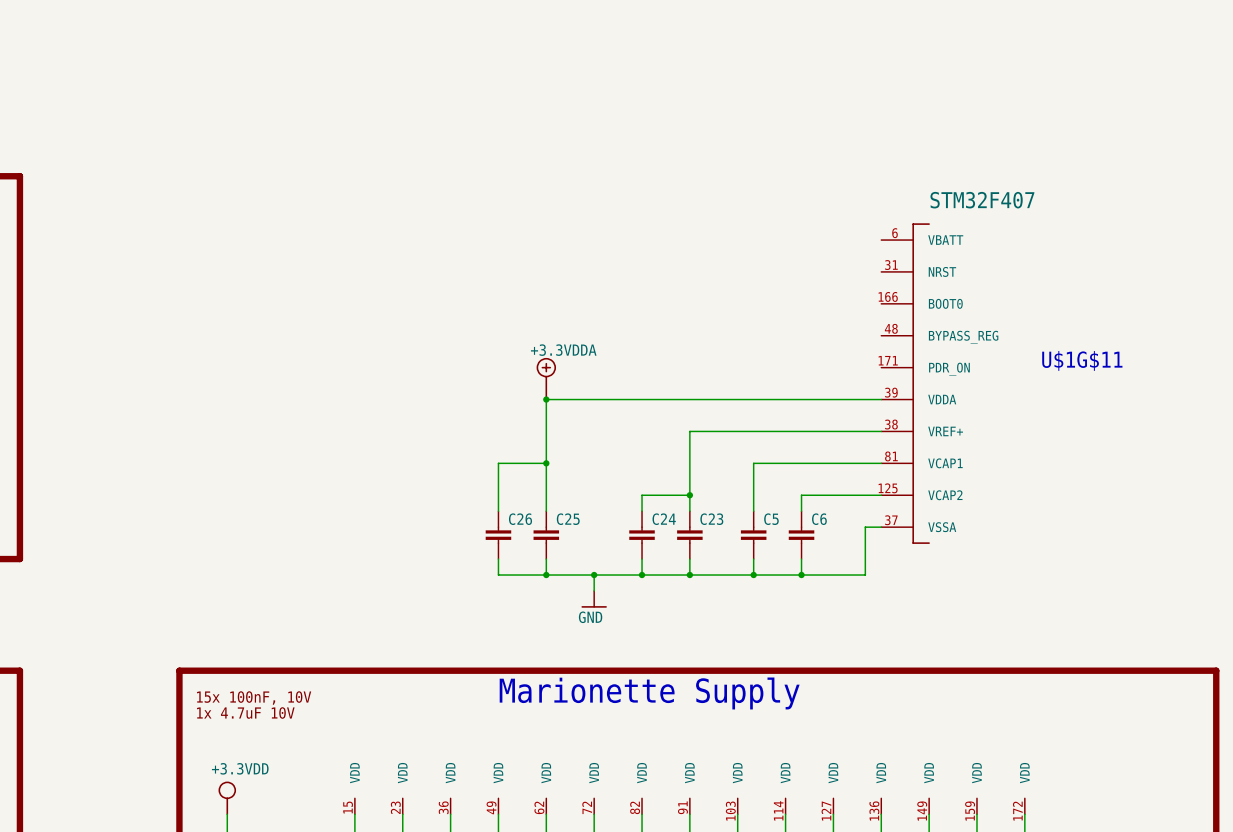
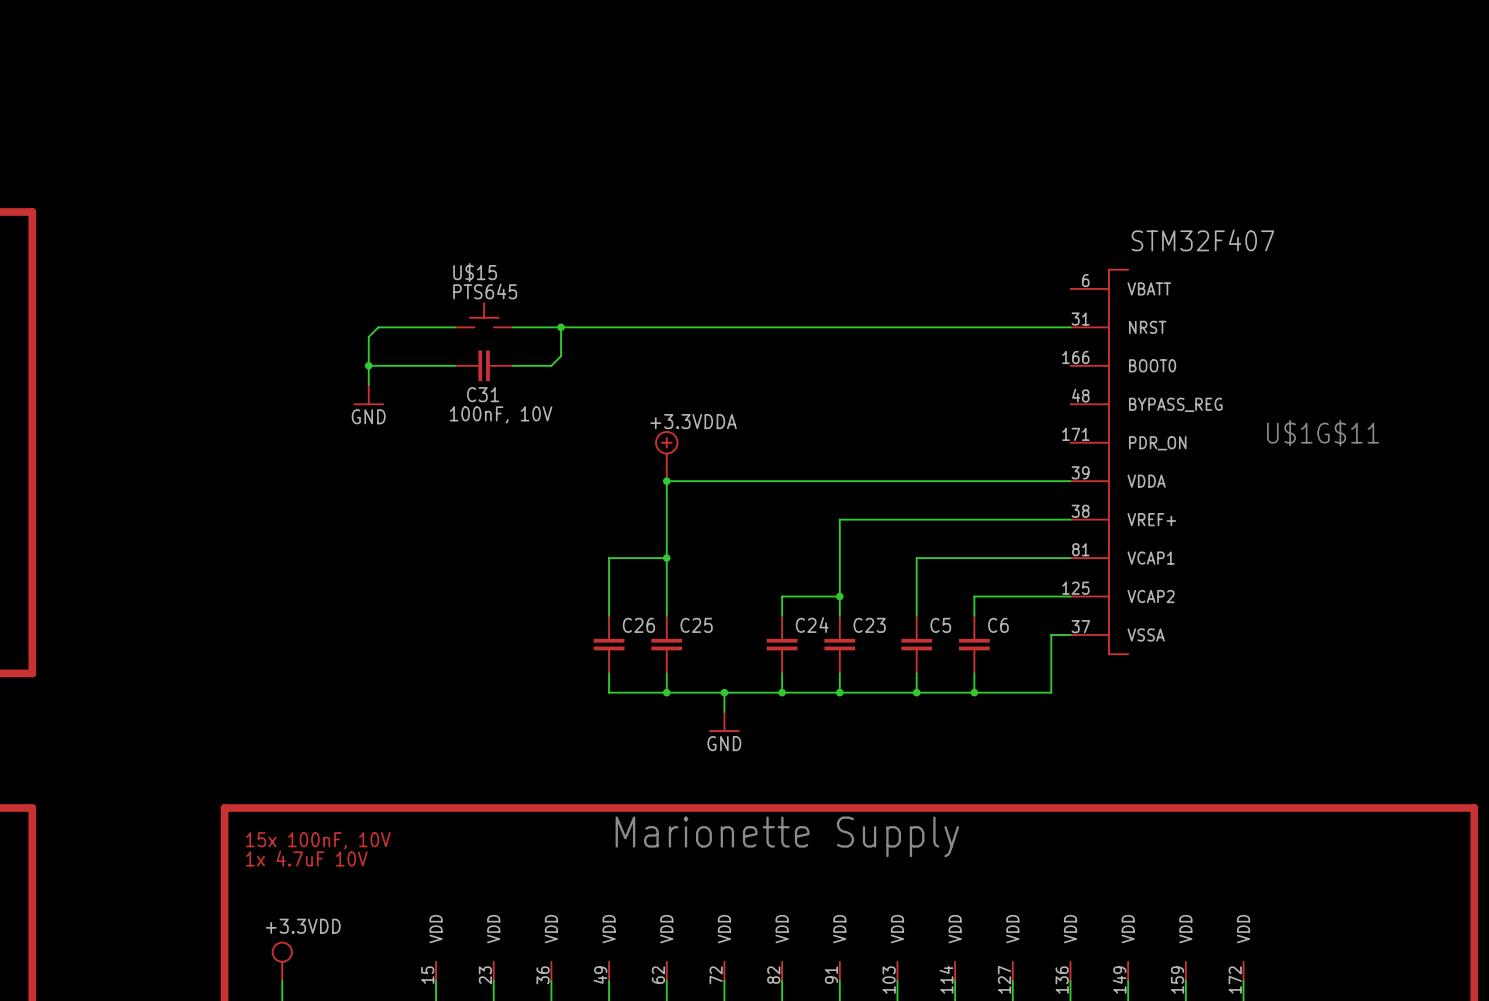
U$15: none -> PTS645 (484, 314)
wire: none -> (455, 327) (378, 327) (368, 336) (368, 385)
wire: none -> (512, 327) (1070, 327)
wire: none -> (561, 327) (561, 356) (551, 365) (512, 365)
junction: none -> (561, 327)
wire: none -> (368, 365) (455, 365)
junction: none -> (368, 365)
C31: none -> 100nF, 10V (484, 365)
power symbol: none -> GND (368, 395)

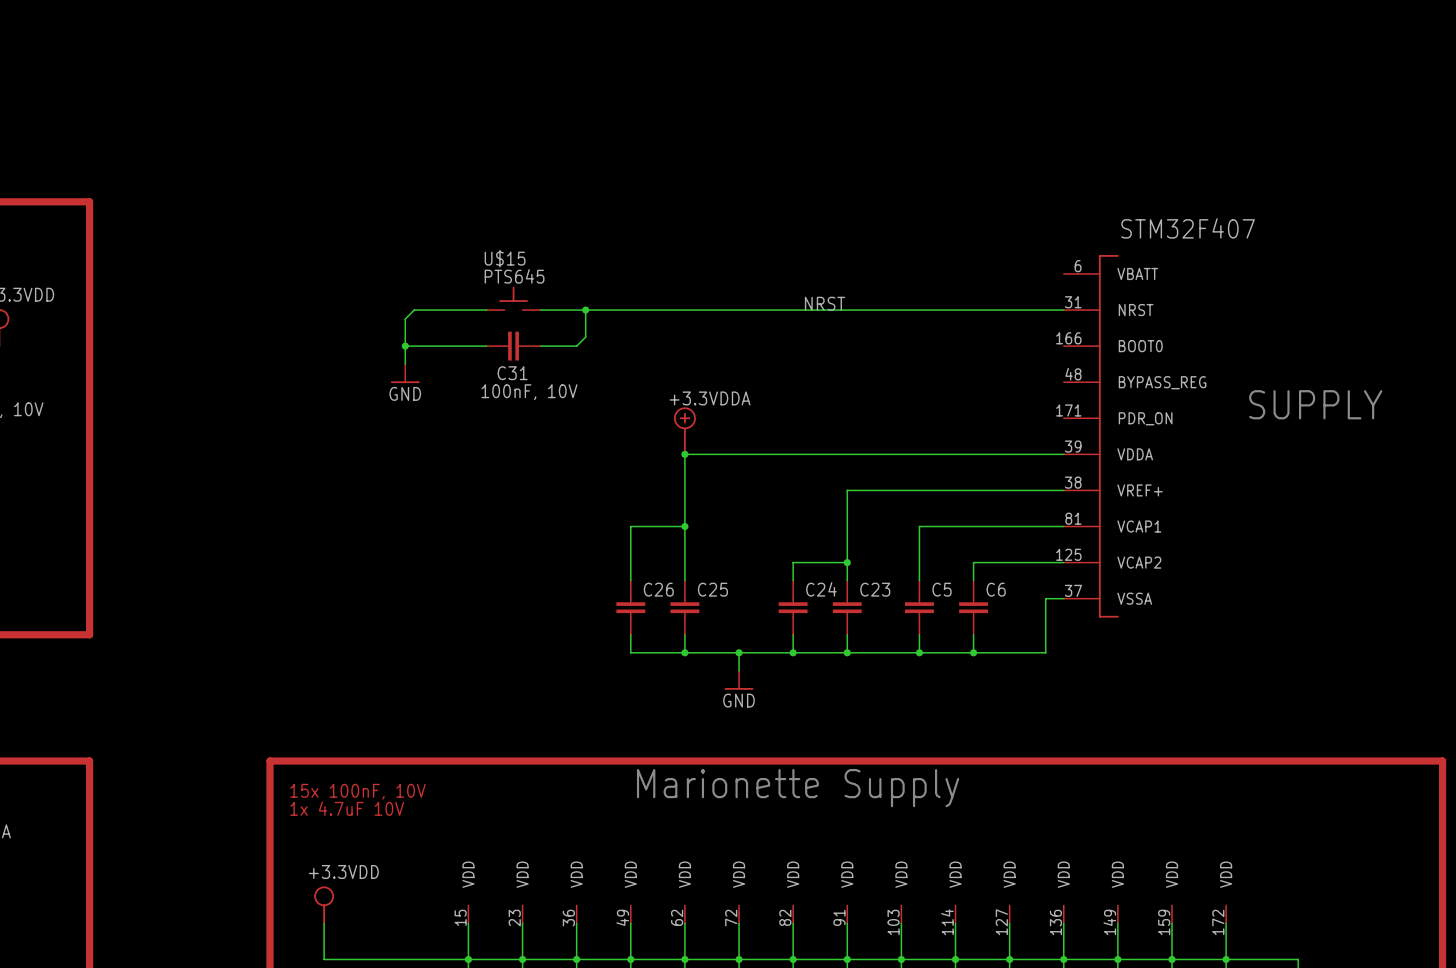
label: none -> NRST (825, 303)
U$1G$11 text: none -> SUPPLY (1315, 404)
U$1G$11 name: U$1G$11 (1323, 433) -> none

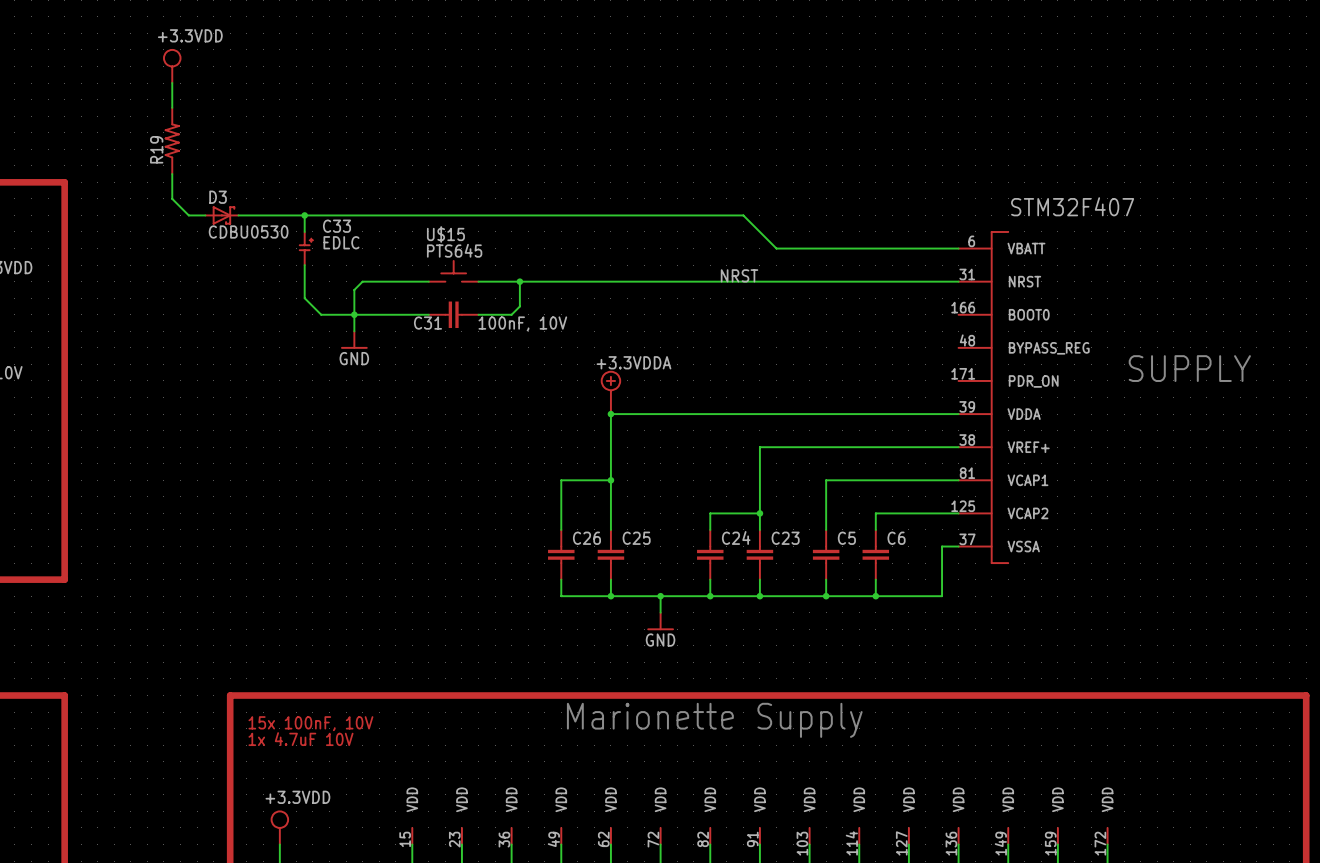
power symbol: none -> +3.3VDD (172, 66)
wire: none -> (172, 83) (172, 107)
R19: none -> (172, 140)
wire: none -> (172, 174) (172, 198) (188, 215) (205, 215)
D3: none -> CDBU0530 (221, 215)
wire: none -> (238, 215) (743, 215) (776, 248) (958, 248)
wire: none -> (304, 215) (304, 231)
junction: none -> (304, 215)
C33: none -> EDLC (306, 248)
wire: none -> (304, 265) (304, 298) (321, 314) (354, 314)
C31 name position: C31 (512, 373) -> C31 (427, 323)
C31 value position: 100nF, 10V (529, 392) -> 100nF, 10V (522, 323)

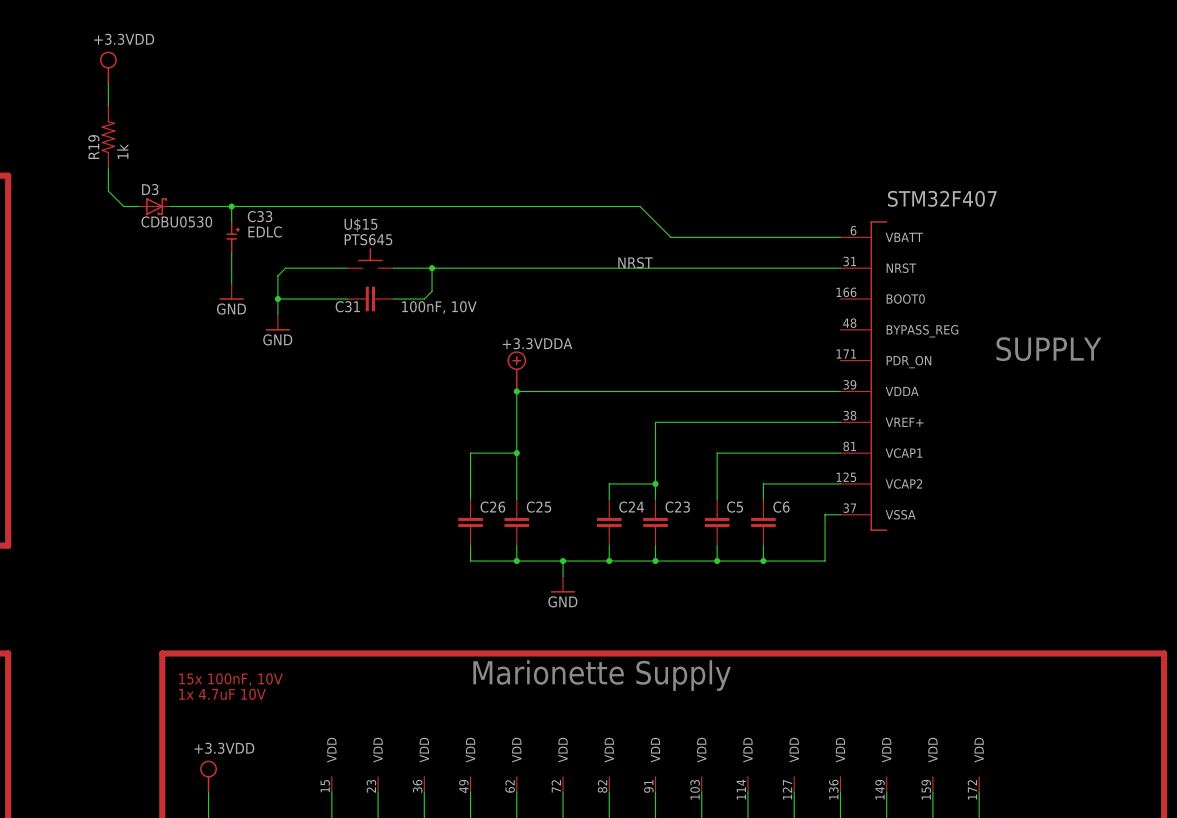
R19 value: none -> 1k (122, 151)
wire: (304, 298) (321, 314) (354, 314) -> none
power symbol: none -> GND (231, 291)

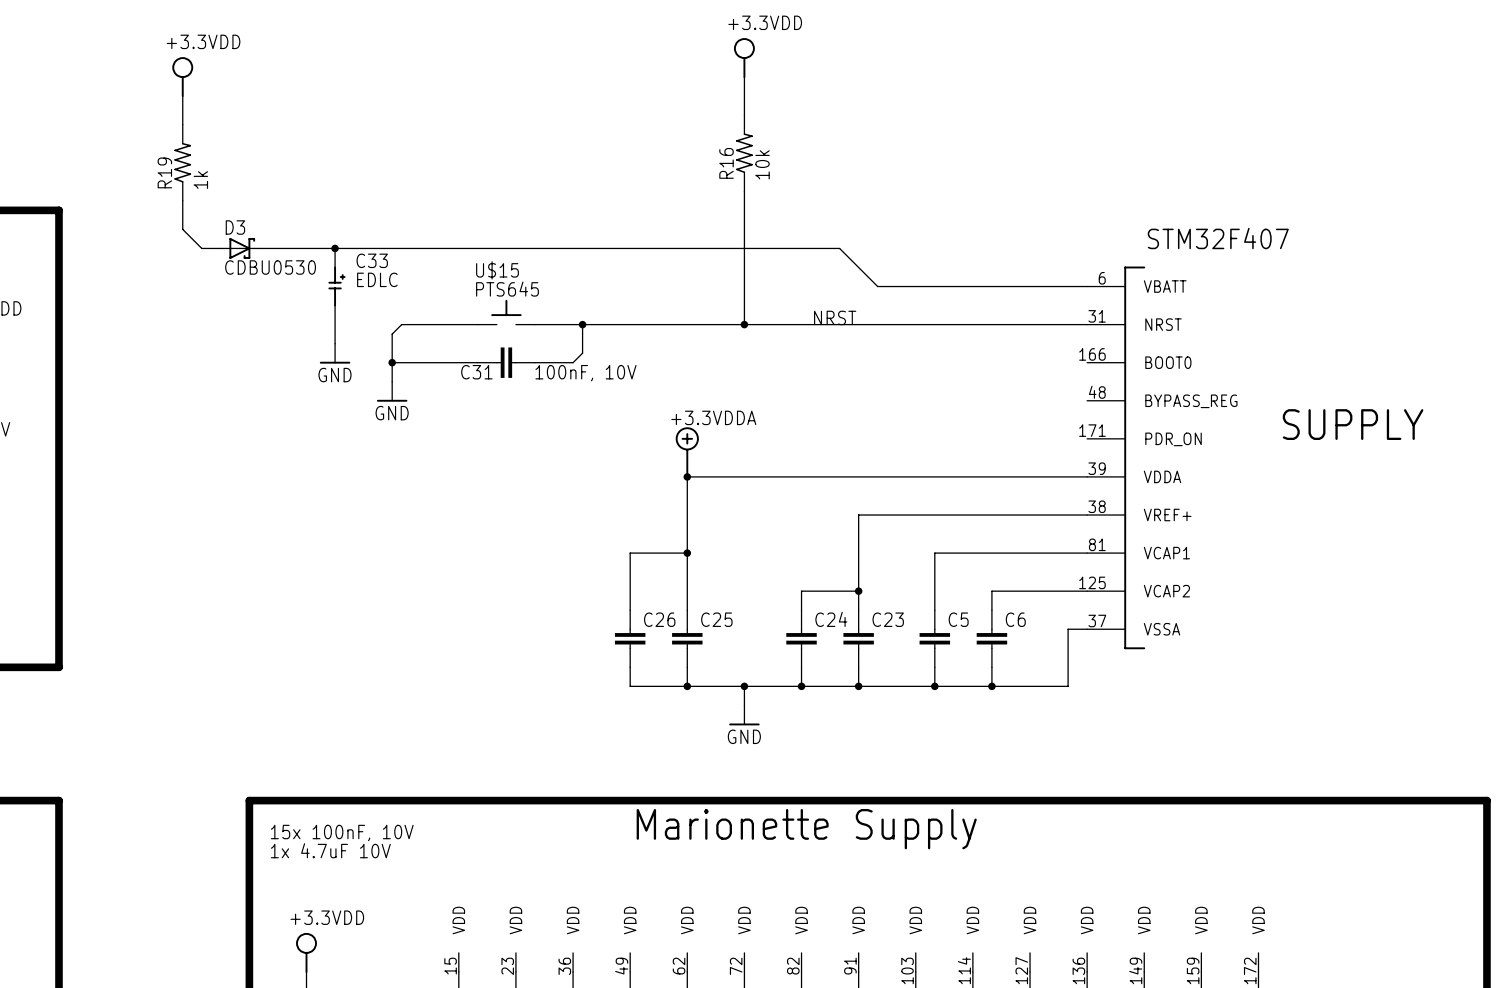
power symbol: none -> +3.3VDD (744, 58)
wire: none -> (744, 77) (744, 115)
R16: none -> 10k (744, 153)
wire: none -> (744, 191) (744, 324)
junction: none -> (744, 324)

